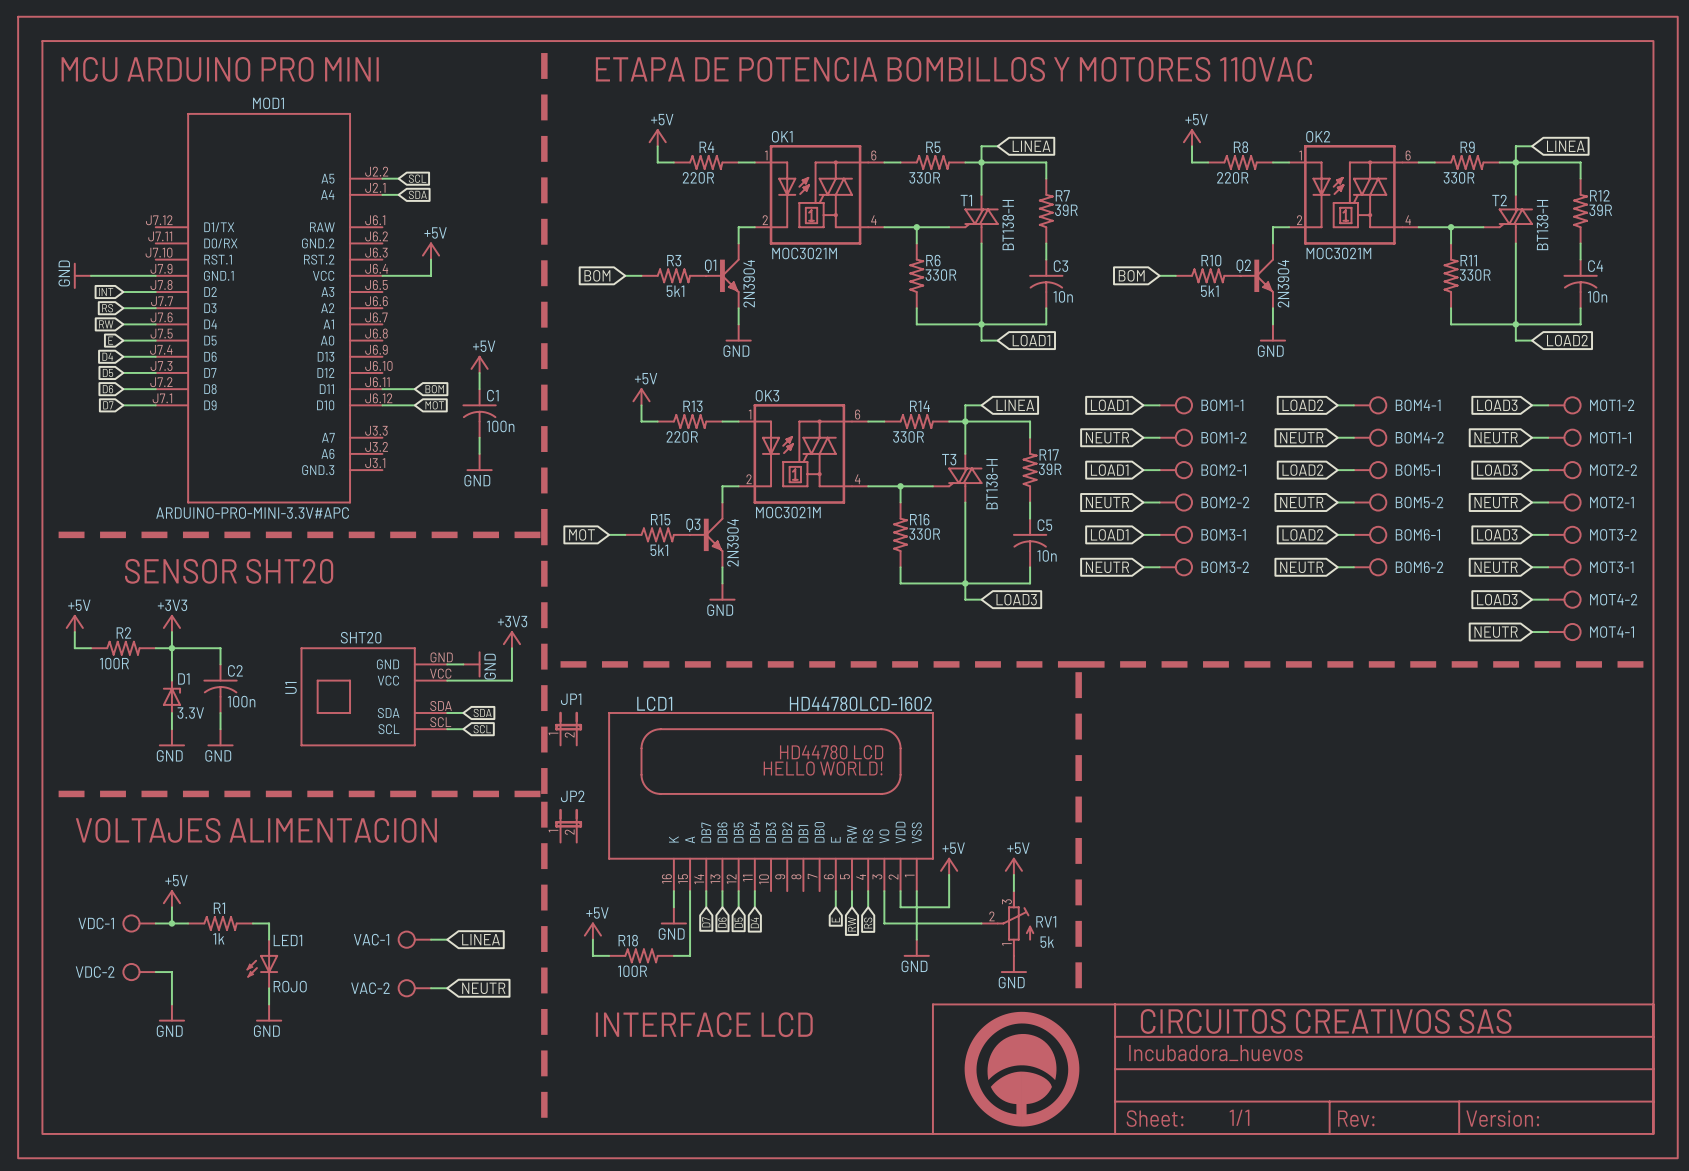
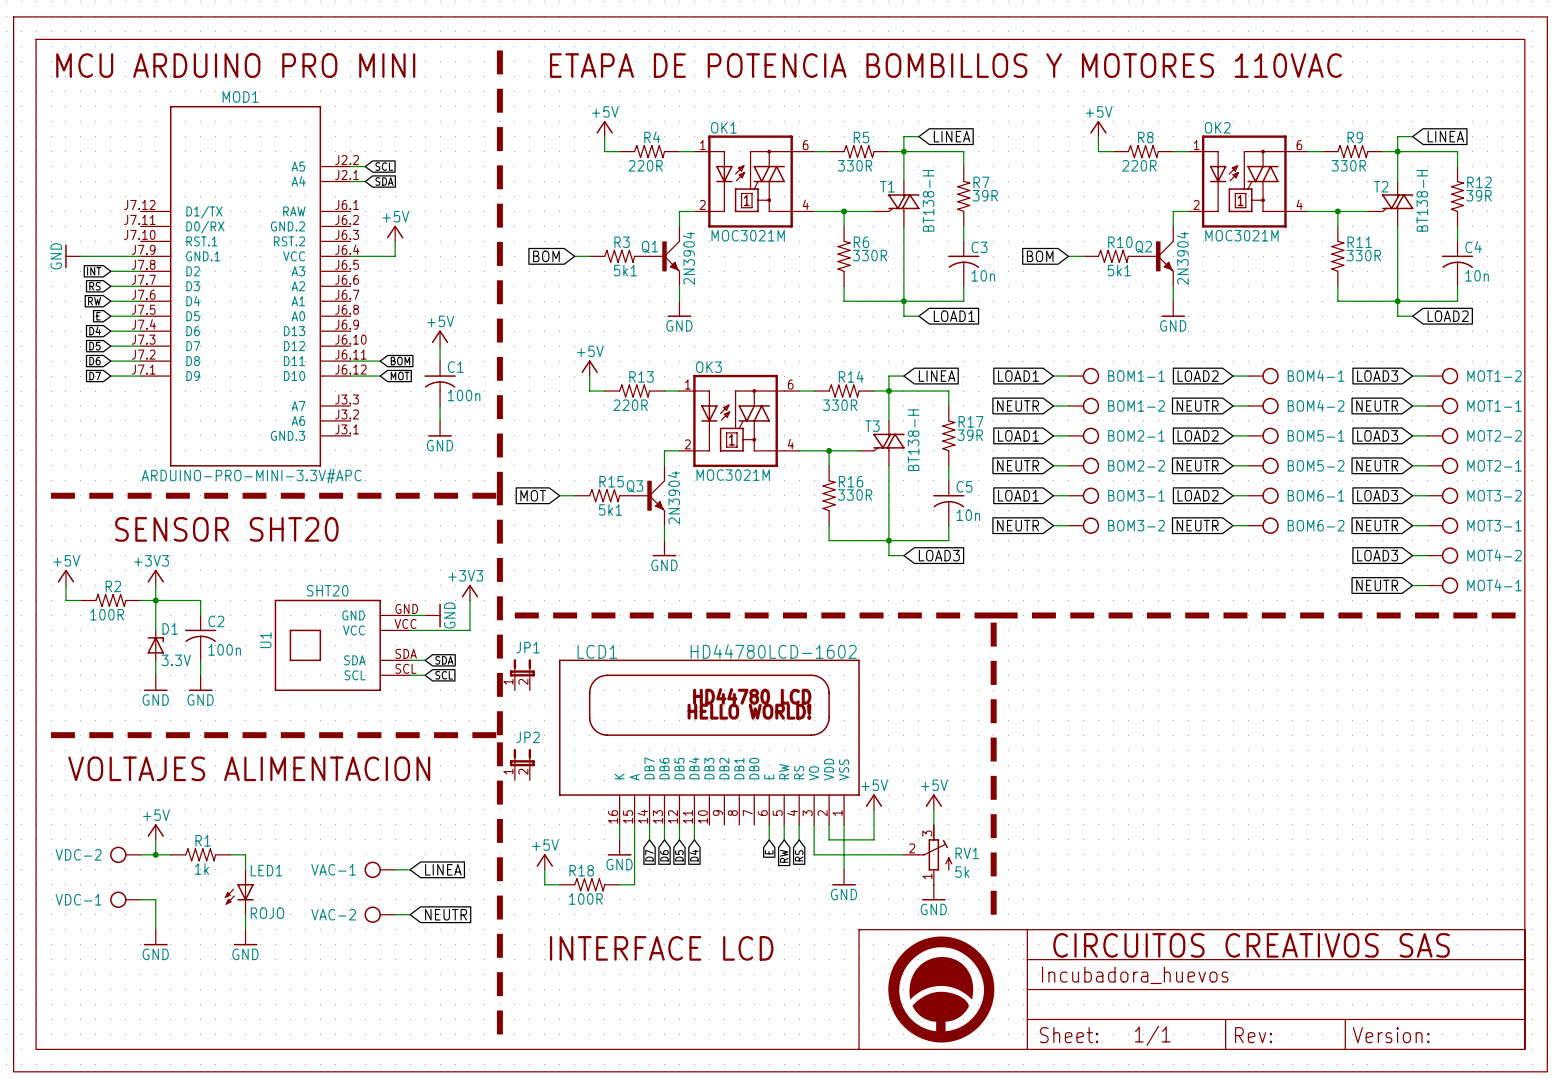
VDC-1 name: VDC-1 (96, 923) -> VDC-2 (78, 854)
VDC-2 name: VDC-2 (95, 972) -> VDC-1 (78, 899)

